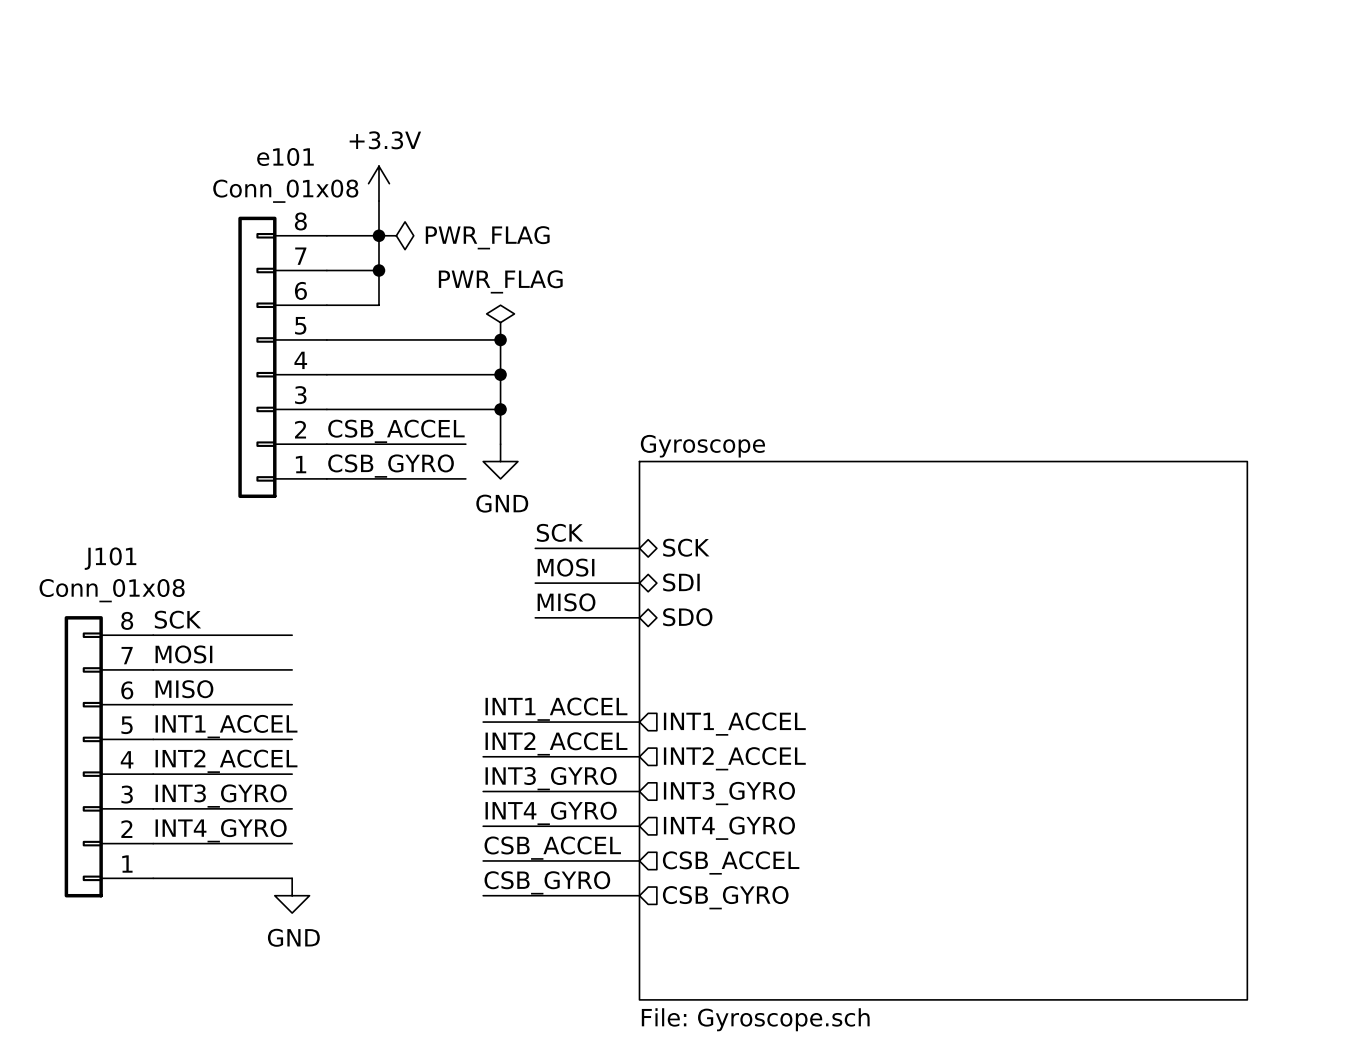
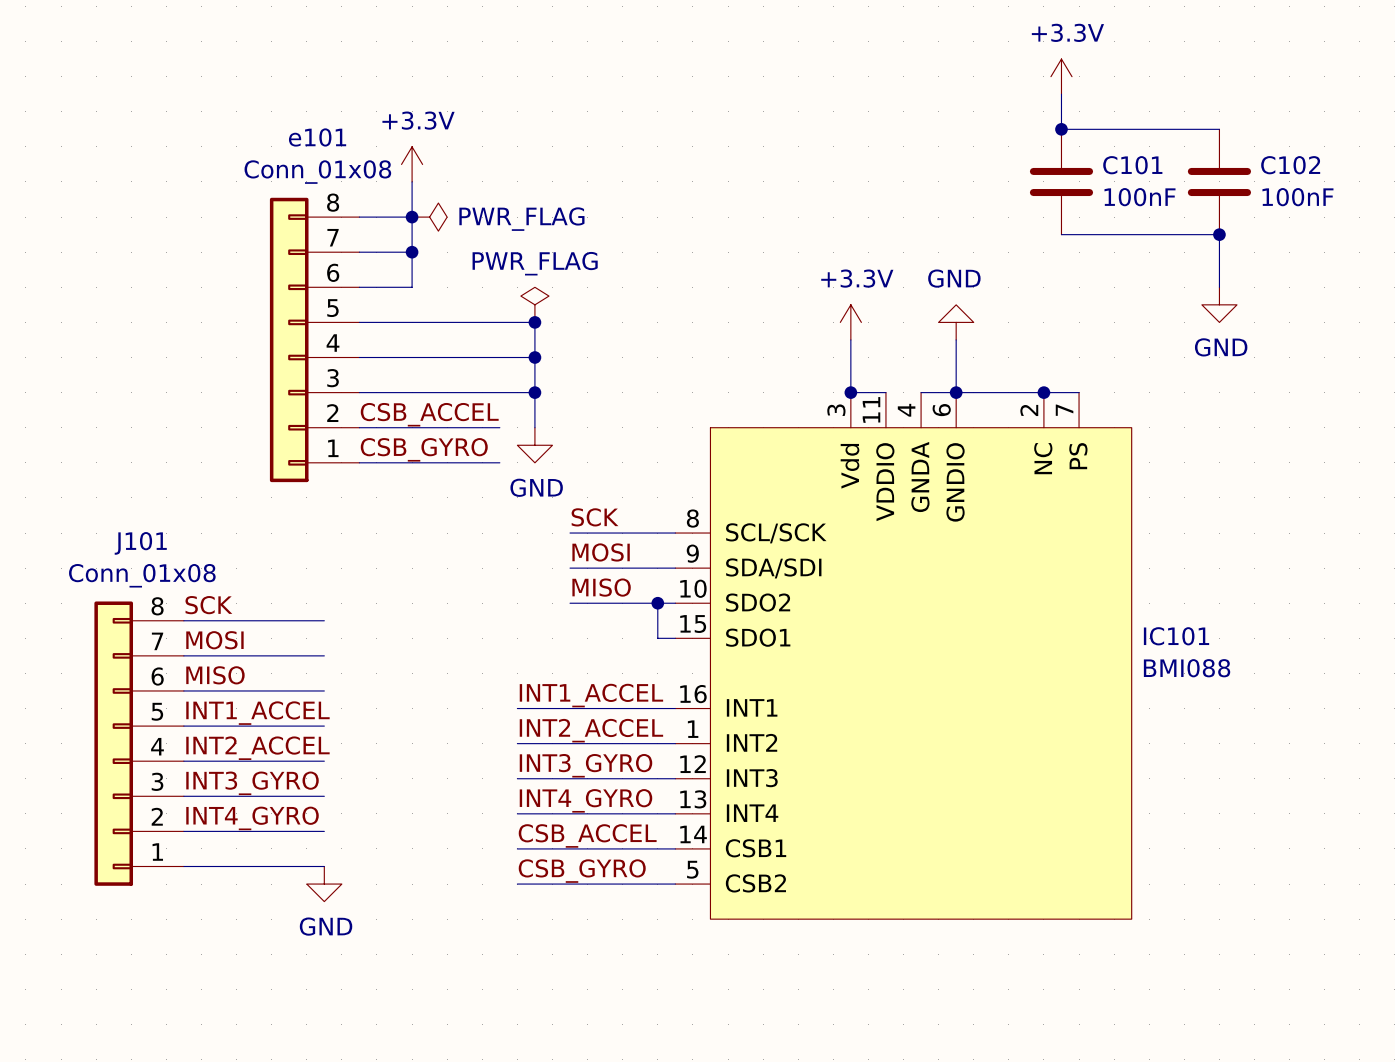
power symbol: none -> +3.3V (1061, 76)
wire: none -> (1061, 94) (1061, 129) (1219, 129)
junction: none -> (1061, 129)
C101: none -> 100nF (1061, 181)
C102: none -> 100nF (1219, 181)
wire: none -> (1061, 234) (1219, 234) (1219, 287)
junction: none -> (1219, 234)
power symbol: none -> GND (1219, 304)
power symbol: none -> +3.3V (850, 322)
power symbol: none -> GND (956, 322)
wire: none -> (850, 339) (850, 392) (885, 392)
wire: none -> (956, 339) (956, 392)
junction: none -> (850, 392)
wire: none -> (921, 392) (1079, 392)
junction: none -> (956, 392)
junction: none -> (1043, 392)
sheet pin: SCK (686, 547) -> none
sheet pin: SDI (681, 582) -> none
wire: none -> (657, 603) (657, 638) (675, 638)
junction: none -> (657, 603)
sheet pin: SDO (687, 617) -> none
IC101: none -> BMI088 (903, 655)
sheet pin: INT1_ACCEL (734, 724) -> none
sheet Gyroscope: File: Gyroscope.sch (943, 730) -> none
sheet pin: INT2_ACCEL (734, 758) -> none
sheet pin: INT3_GYRO (729, 793) -> none
sheet pin: INT4_GYRO (729, 828) -> none
sheet pin: CSB_ACCEL (731, 862) -> none
sheet pin: CSB_GYRO (725, 897) -> none

